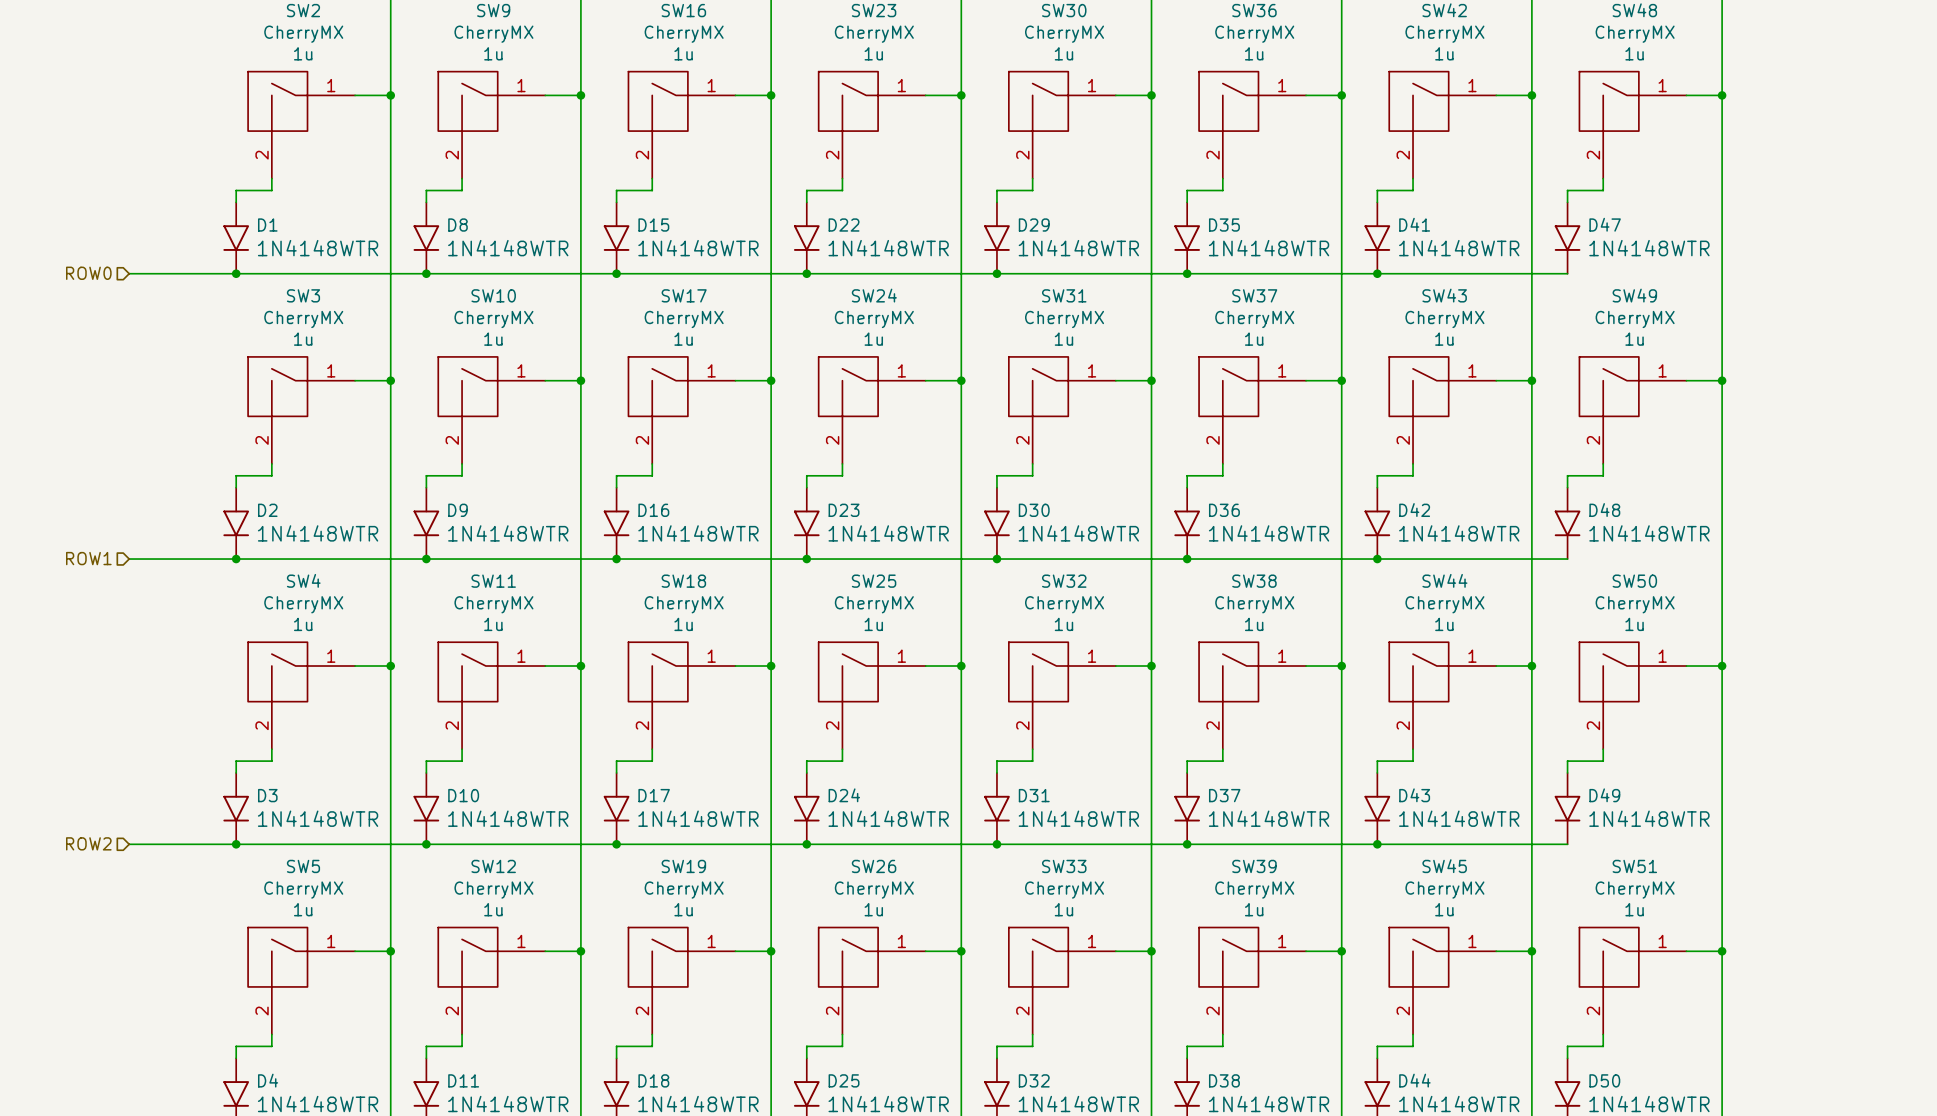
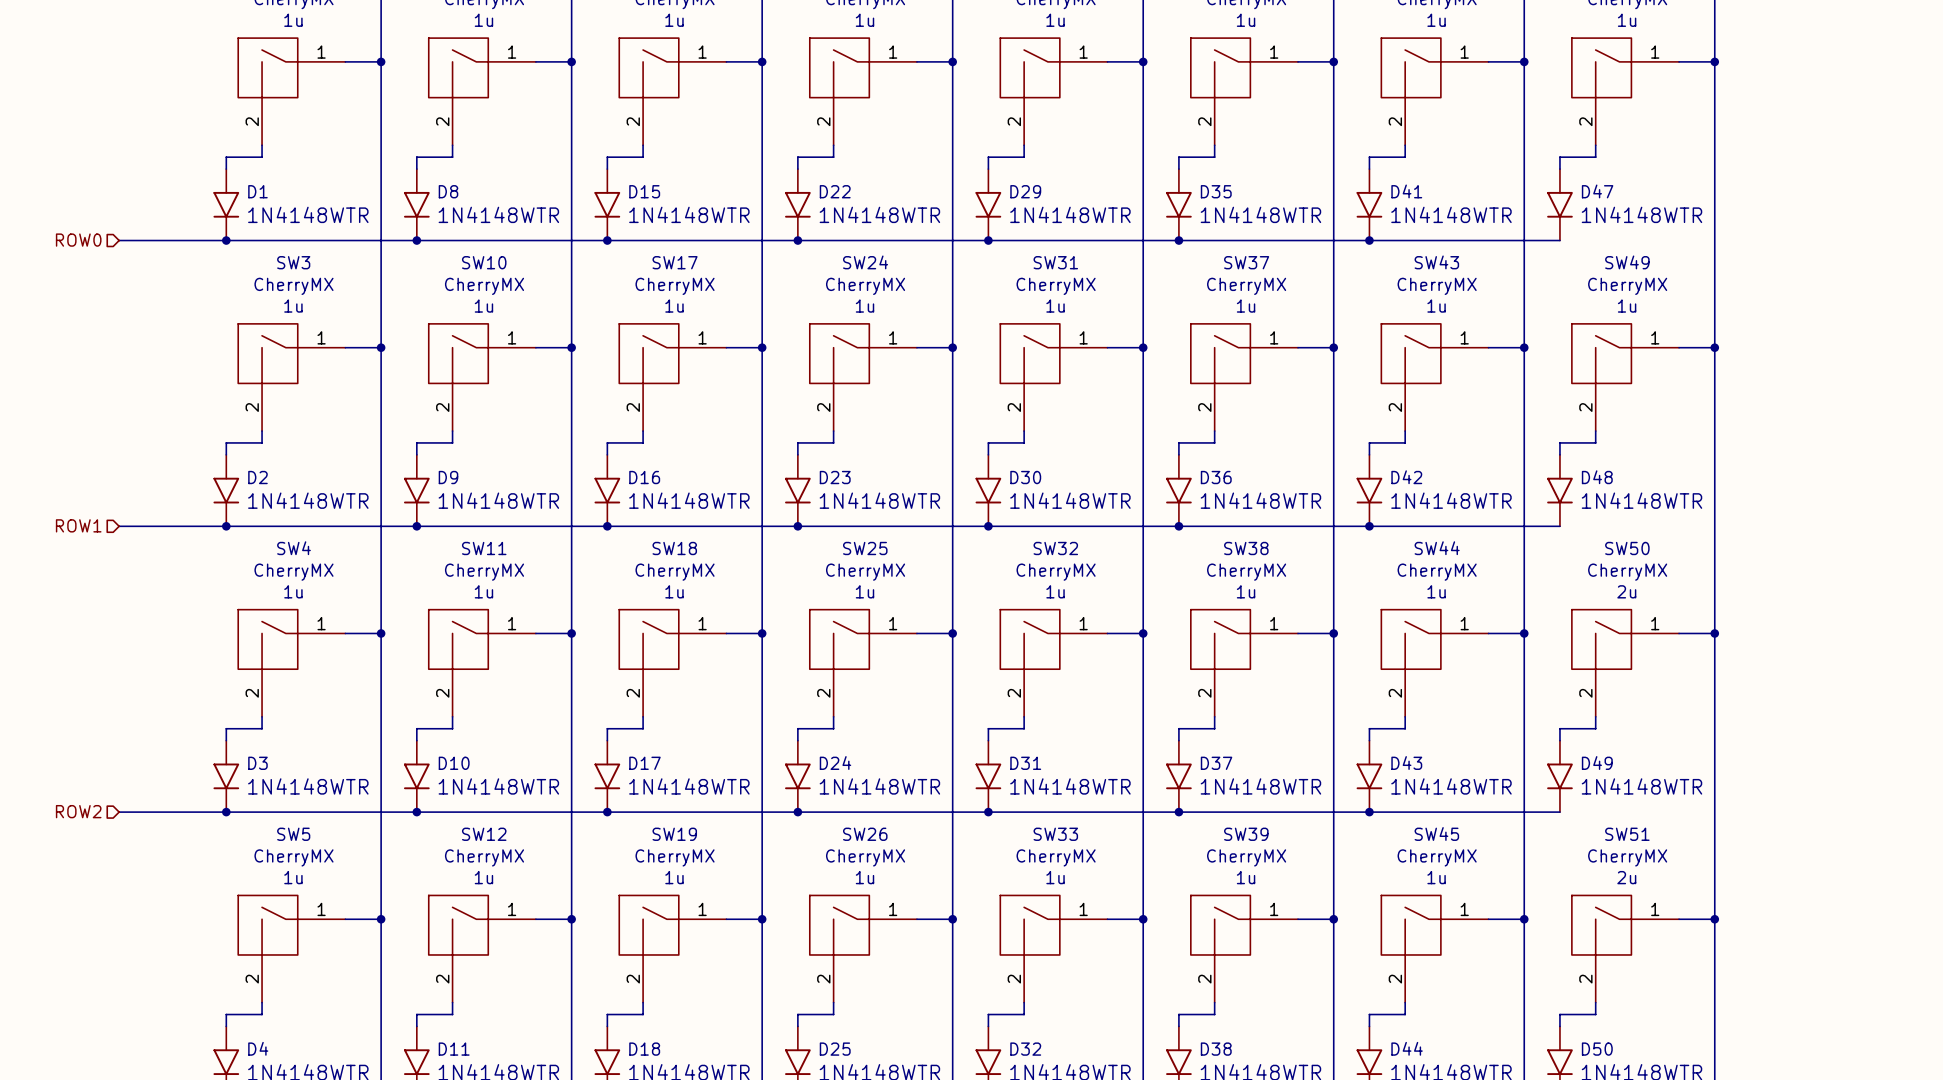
SW50 text: 1u (1634, 624) -> 2u (1626, 591)
SW51 text: 1u (1634, 909) -> 2u (1626, 877)

